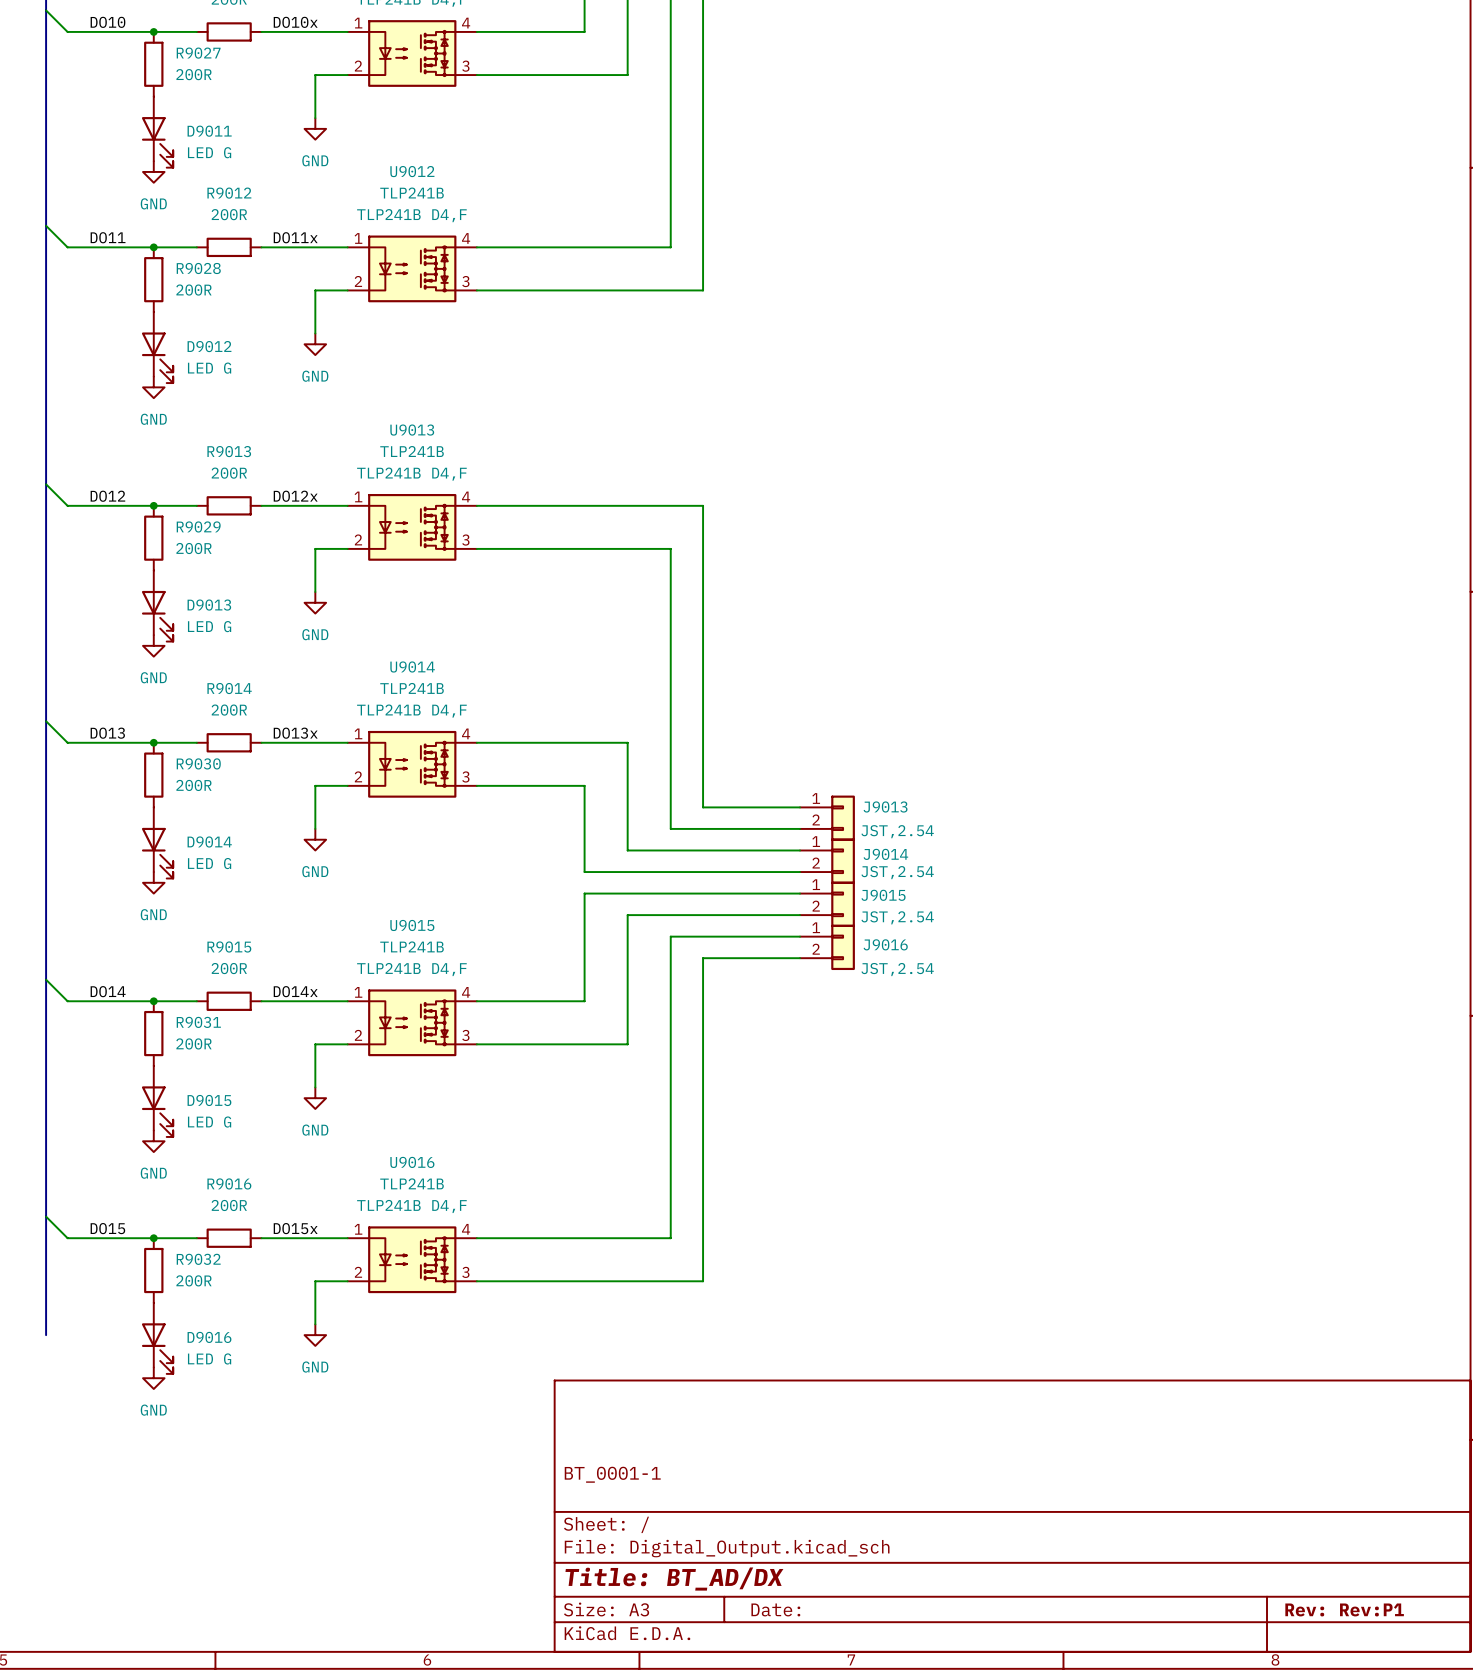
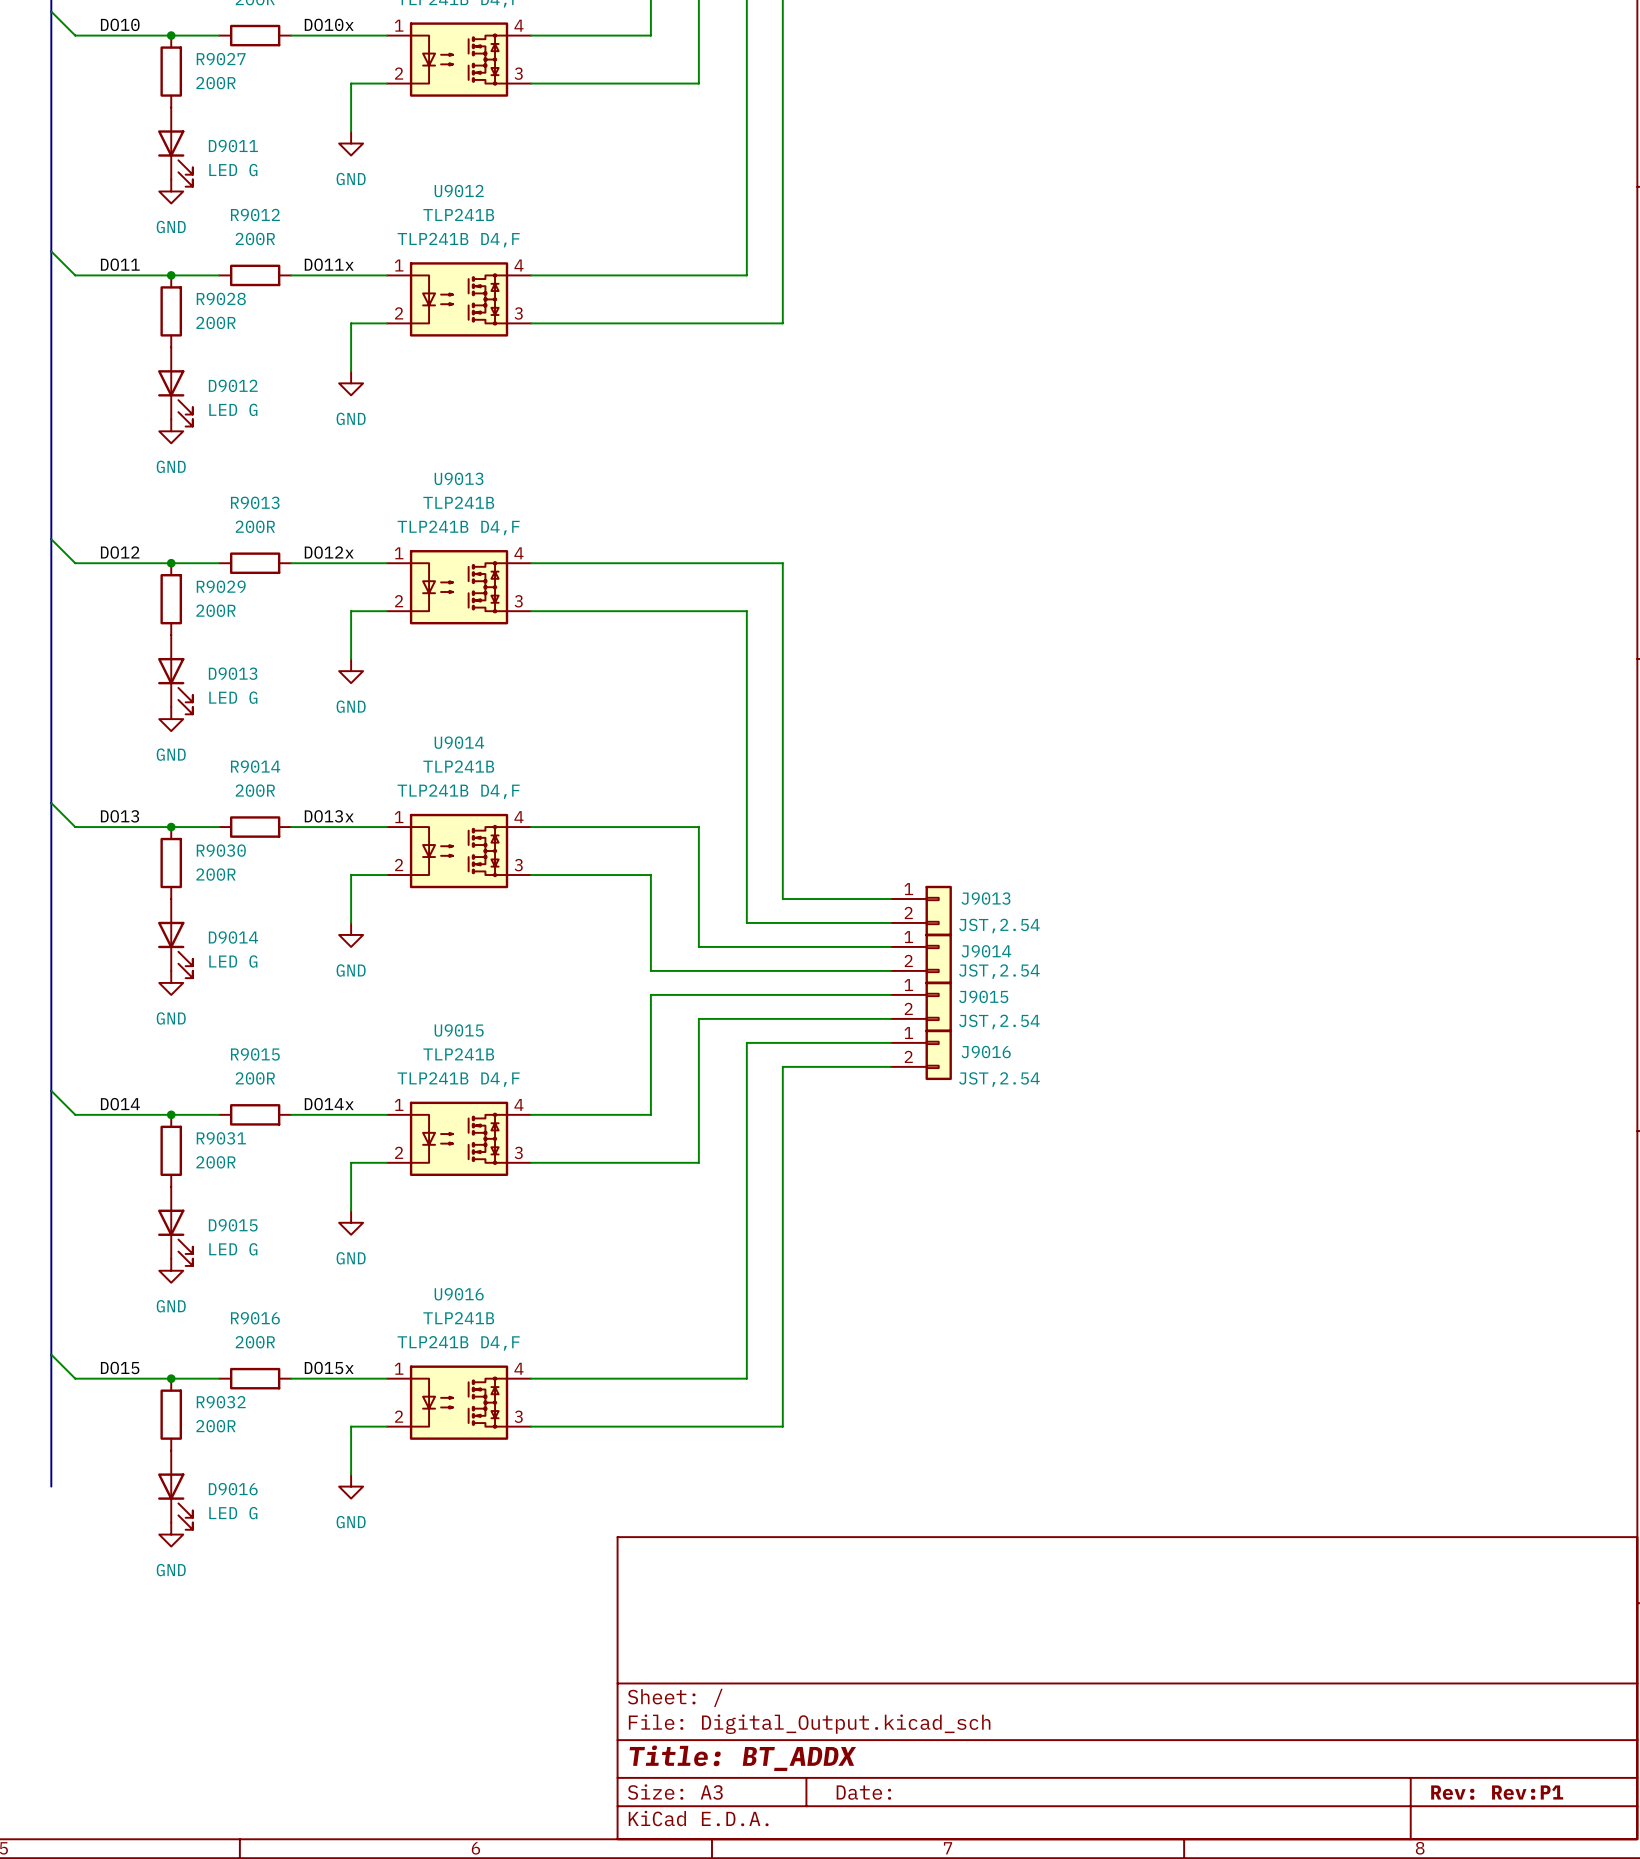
title block: BT_0001-1 (612, 1474) -> none
title block: Title: BT_AD/DX (674, 1579) -> Title: BT_ADDX (742, 1758)

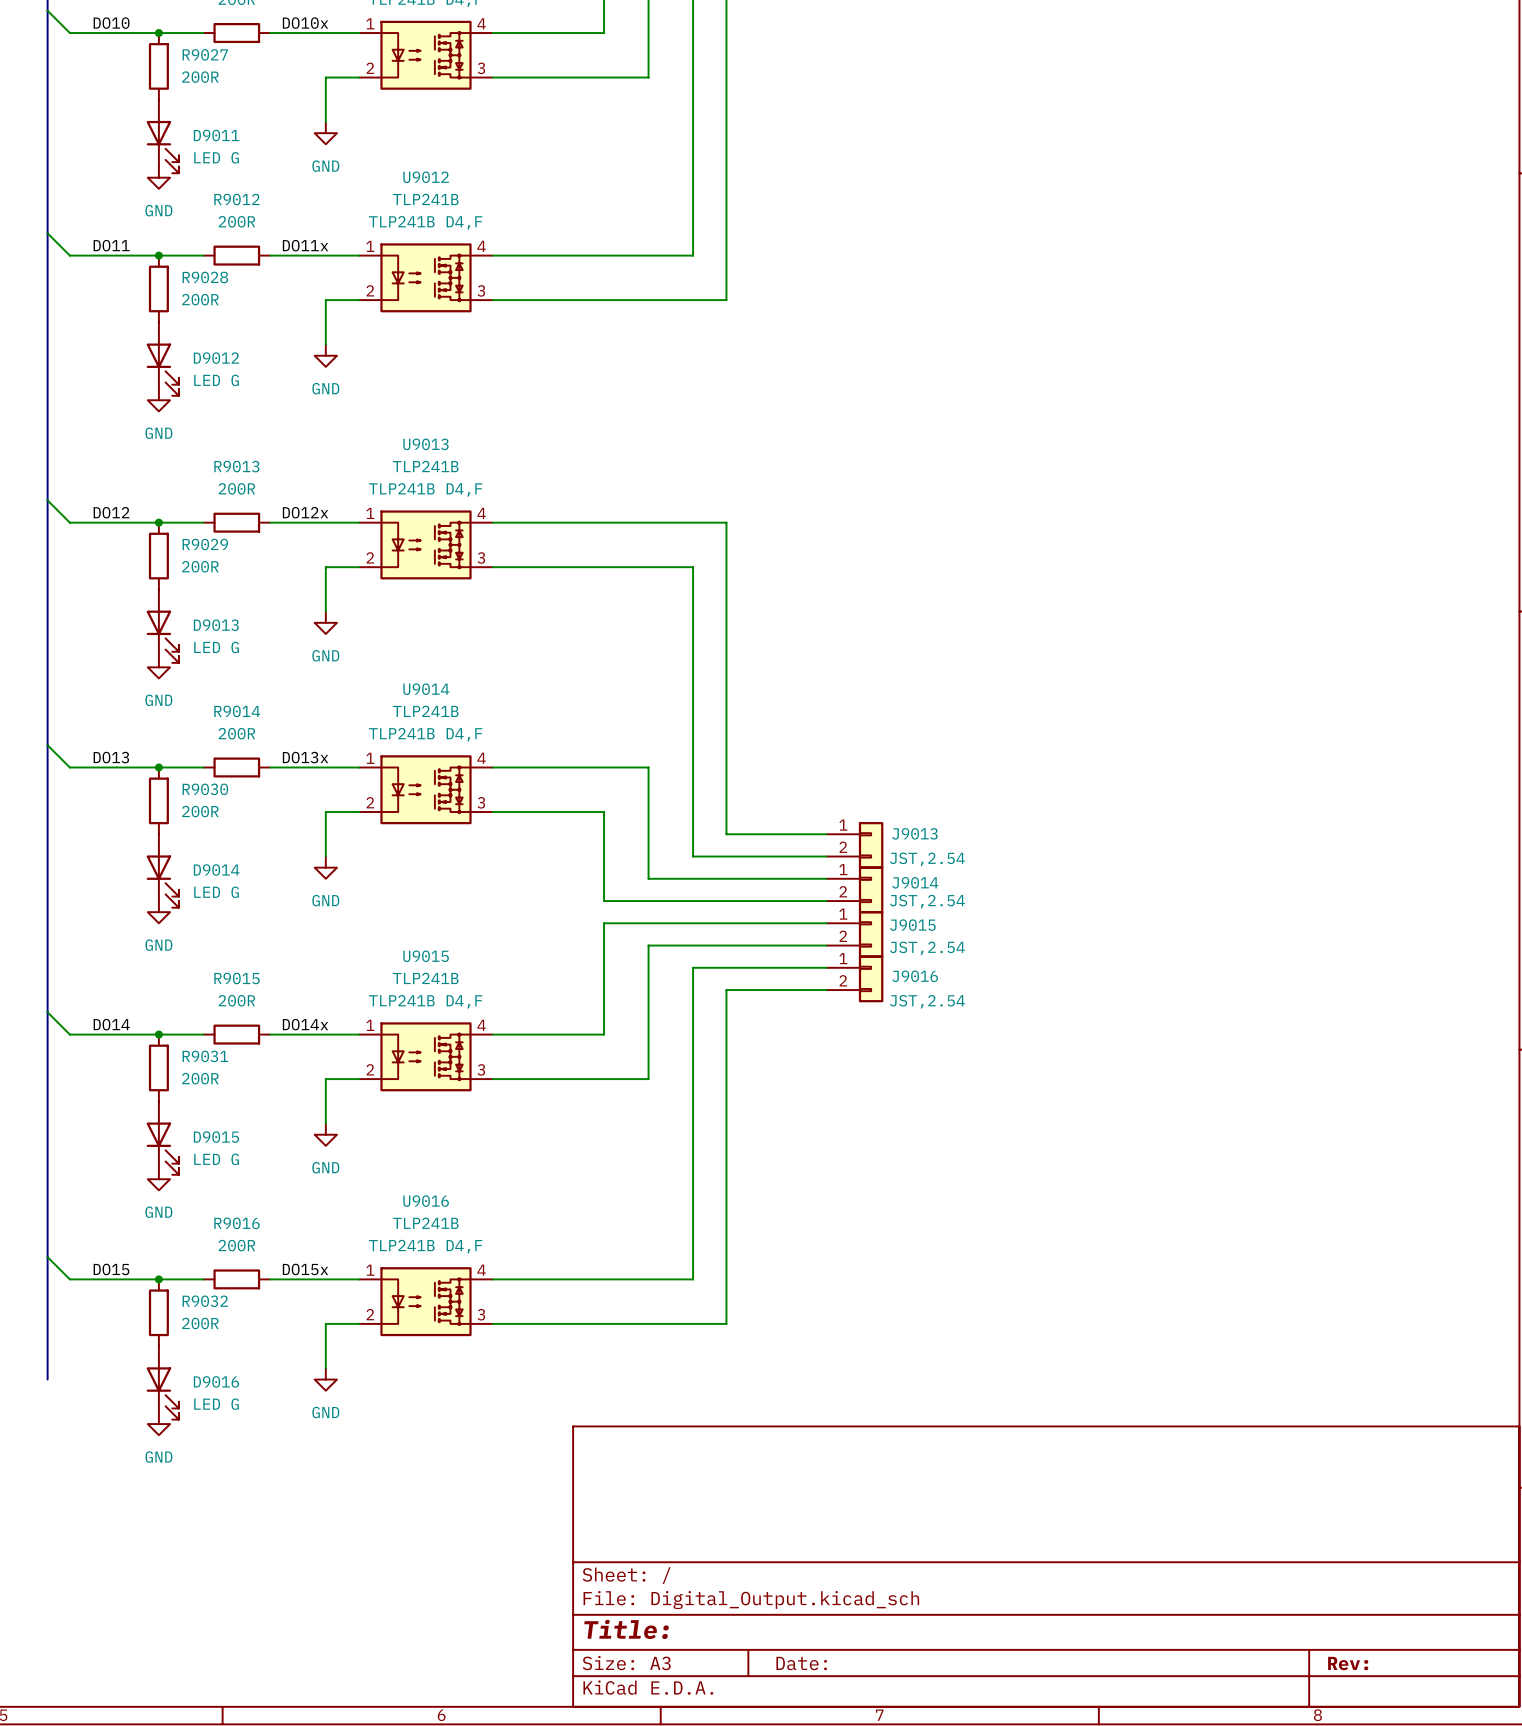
title block: Title: BT_ADDX (742, 1758) -> Title: (626, 1629)
title block: Rev: Rev:P1 (1497, 1792) -> Rev: (1348, 1663)

